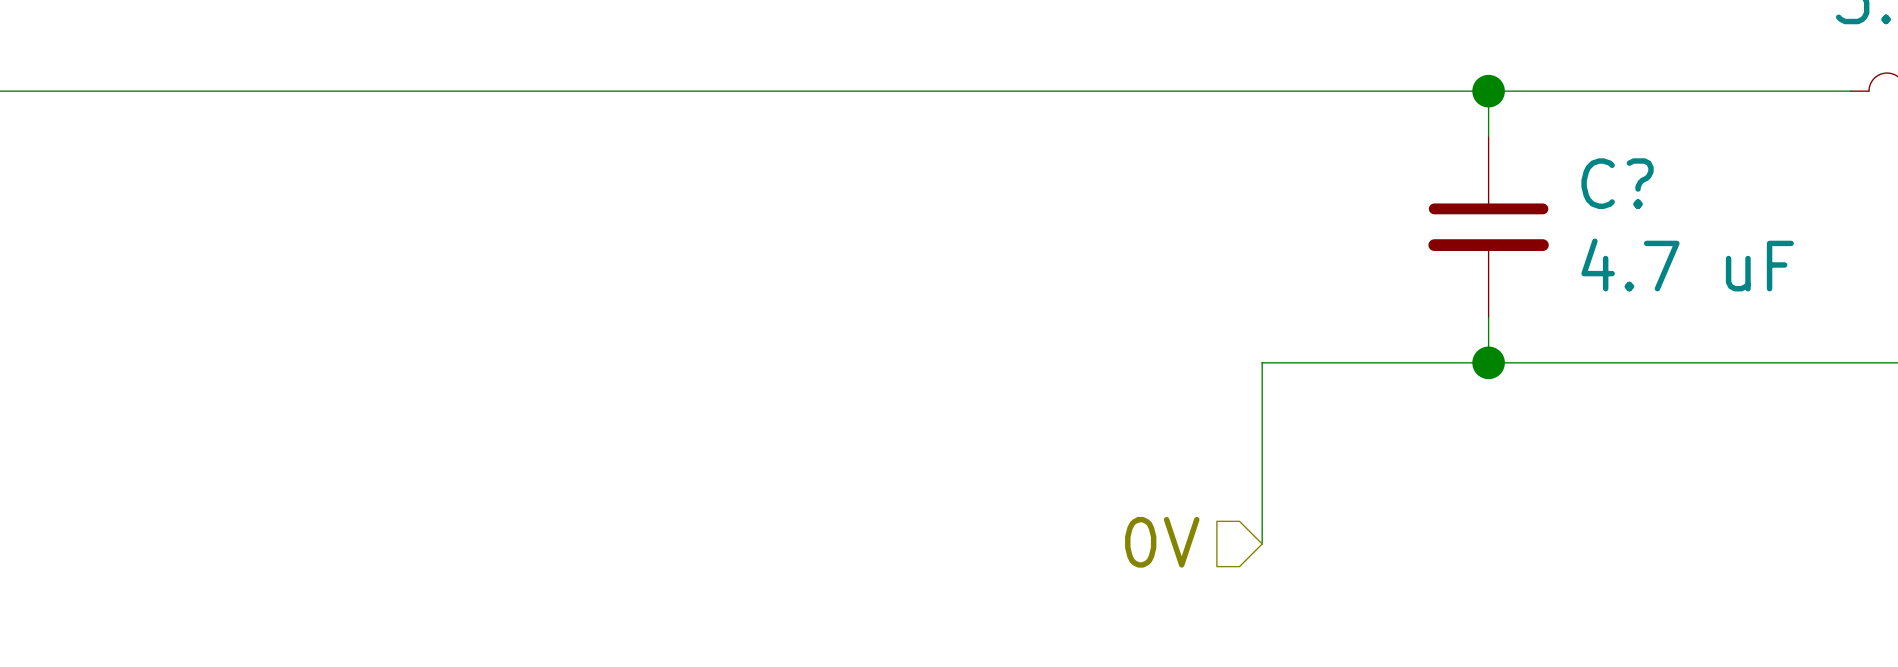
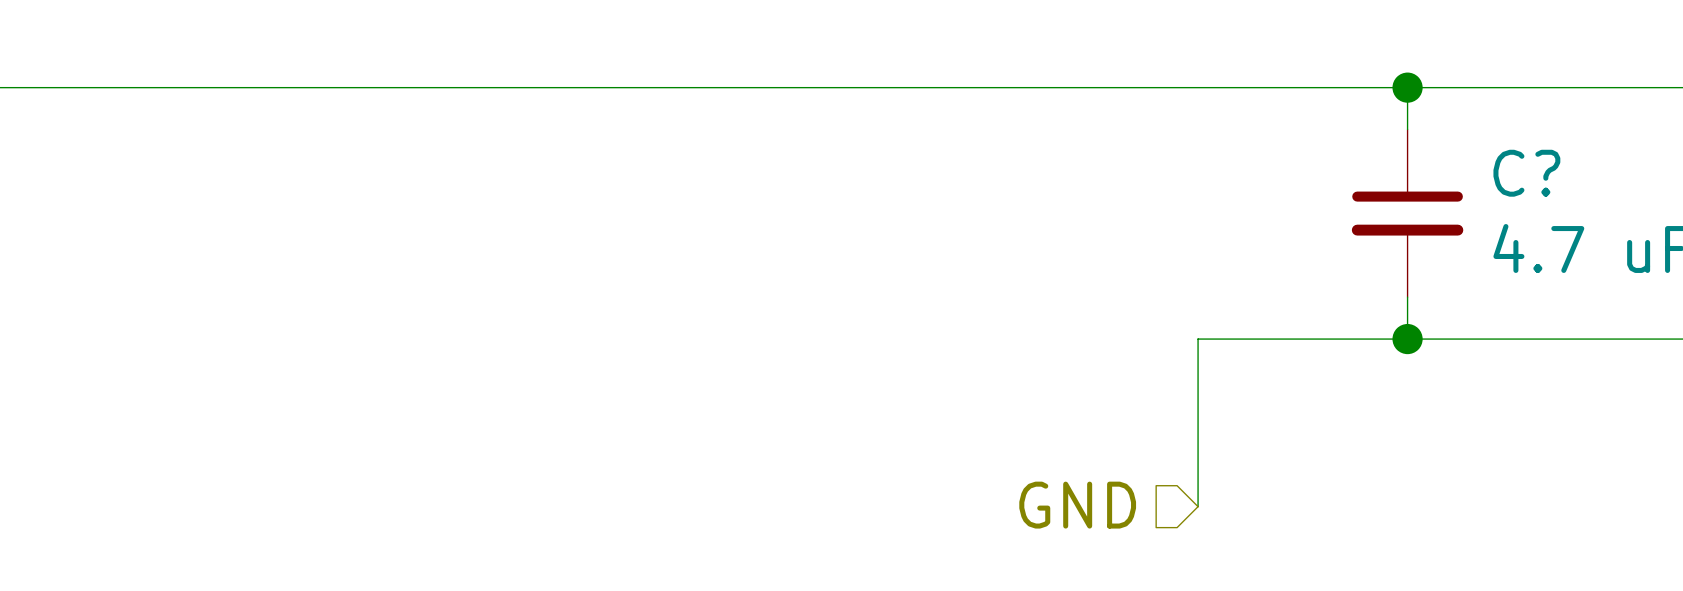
hierarchical label: 0V (1162, 542) -> GND (1077, 505)

